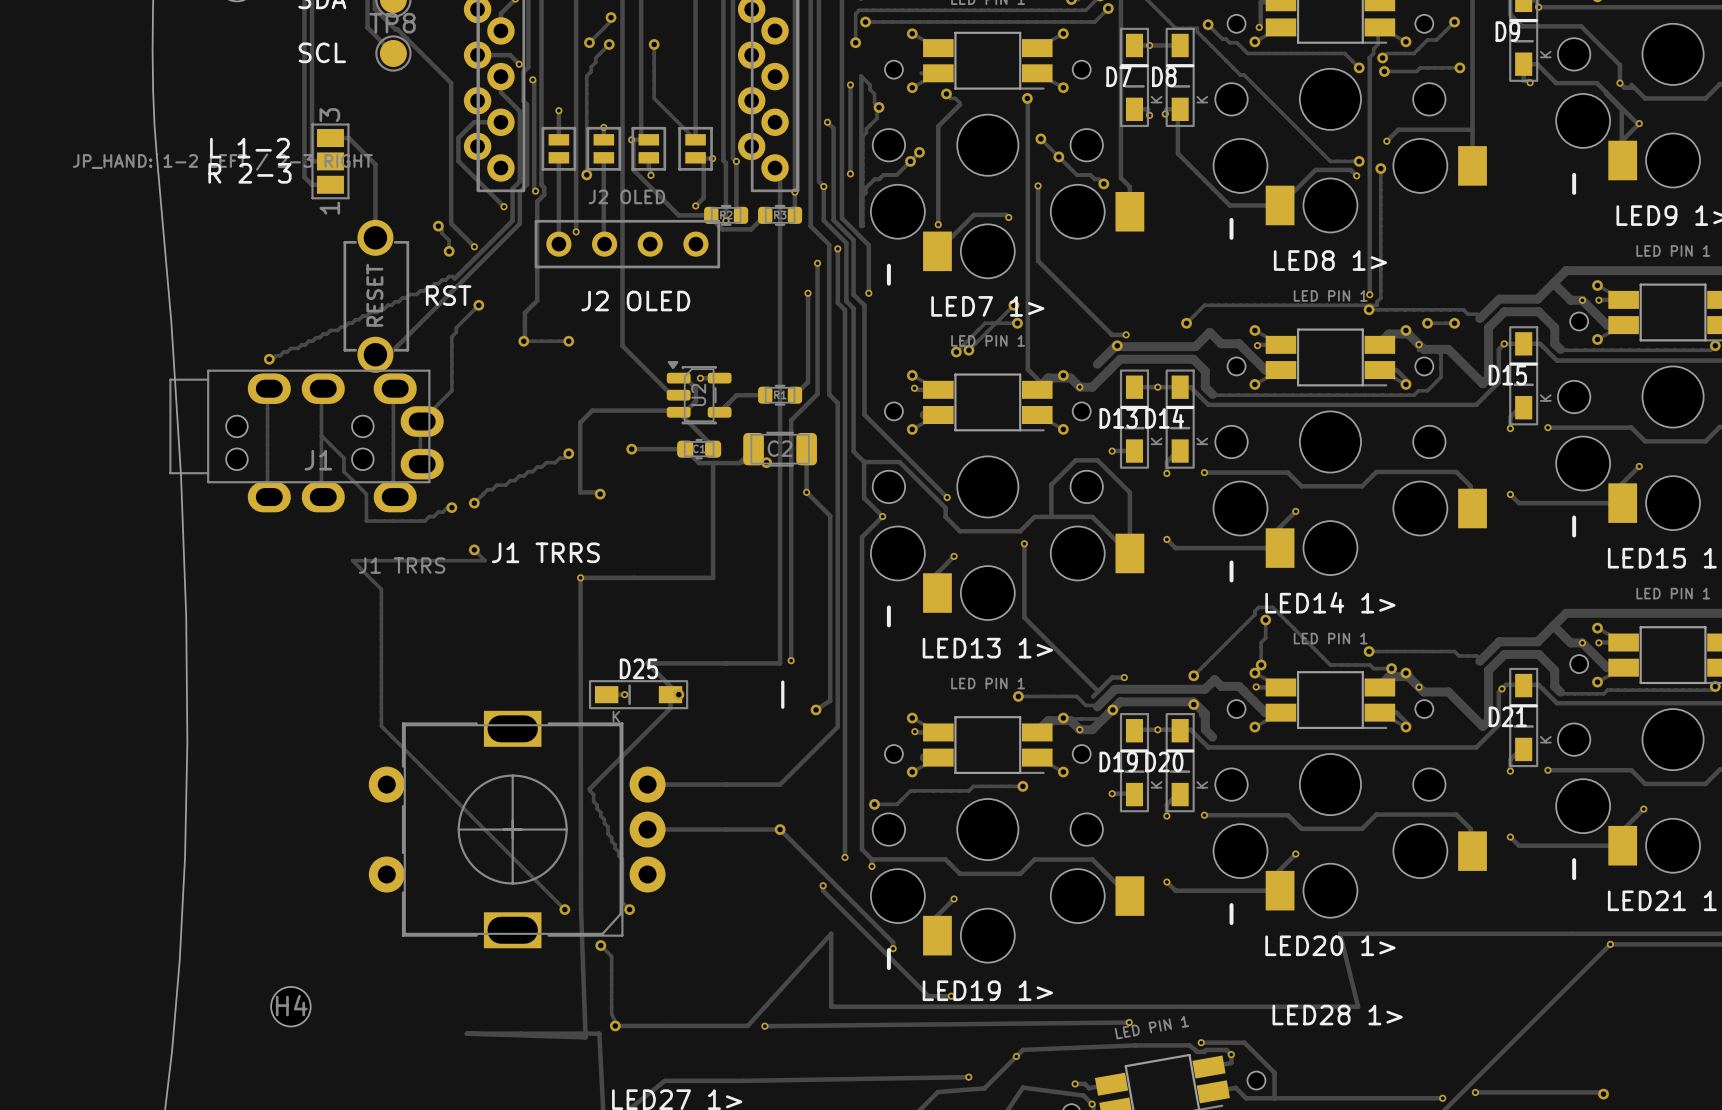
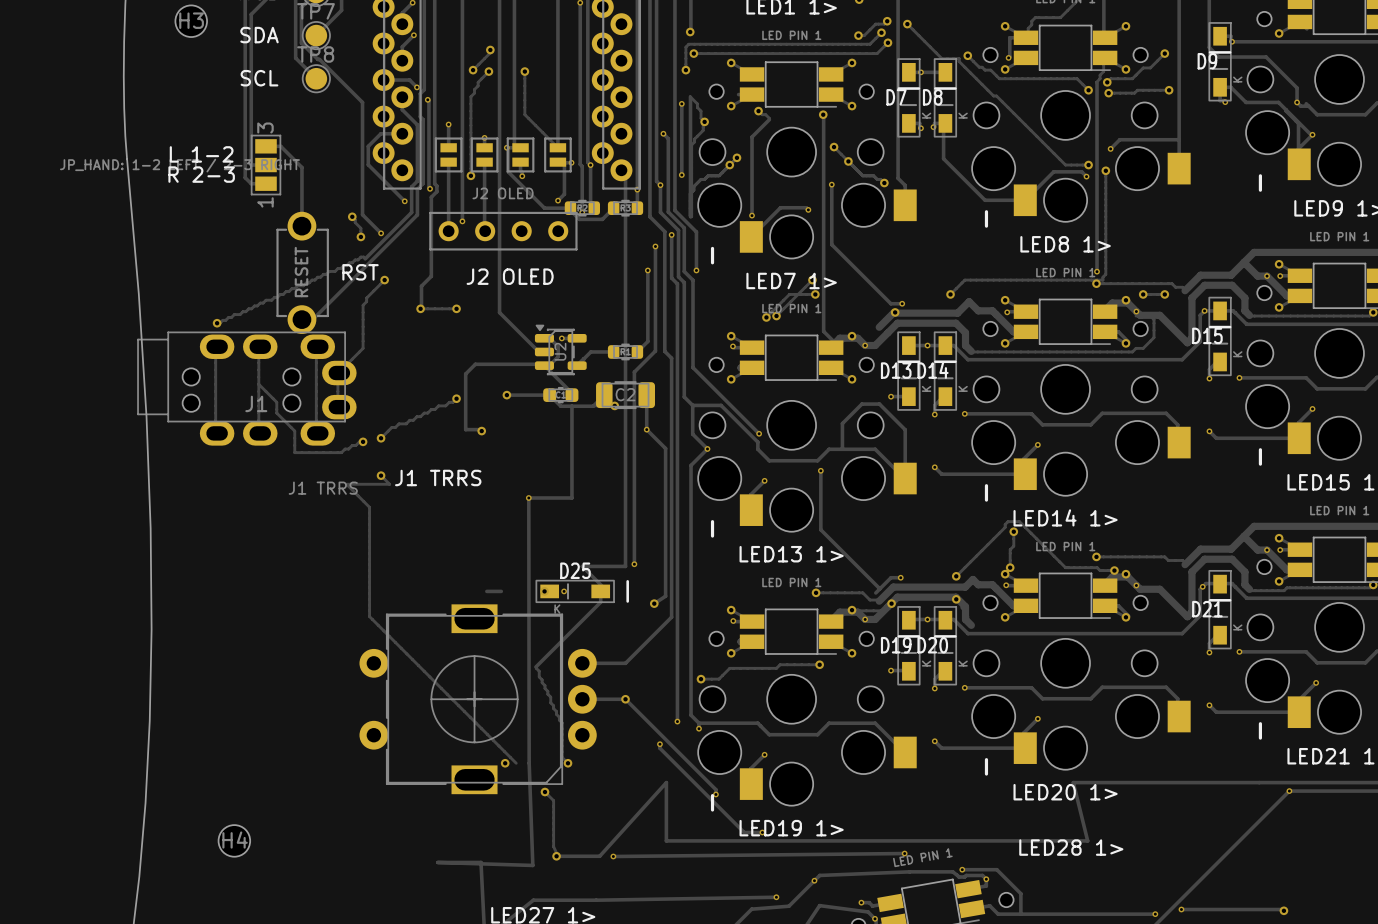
track: (431, 560) (352, 560) (381, 589) (381, 726) (564, 909) -> (346, 484) (369, 507) (369, 616) (516, 763)
via: (580, 577) -> none
track: (659, 577) (580, 577) (581, 909) (585, 1037) (466, 1033) (545, 1033) -> (528, 498) (529, 763) (532, 865) (437, 862)
via: none -> (528, 498)
track: (726, 663) (647, 663) (678, 694) (670, 694) (670, 708) (589, 789) (593, 794) (593, 801) (608, 826) (608, 834) (622, 859) (622, 902) (629, 909) -> (582, 566) (607, 591) (600, 591) (600, 602) (535, 666) (550, 697) (550, 702) (562, 722) (562, 757) (568, 763)
text position: D25 (638, 668) -> D25 (575, 570)
via: (624, 694) -> none
part position: (638, 694) -> (575, 591)
via: none -> (564, 591)
track: (647, 784) (726, 784) -> none
part position: (517, 829) -> (478, 699)
track: (647, 829) (726, 829) -> none
via: (564, 909) -> none
via: none -> (568, 763)
track: (600, 945) (611, 956) (611, 1013) (616, 1024) (615, 1025) (693, 1025) -> (544, 792) (553, 800) (553, 846) (556, 856)
via: (600, 945) -> none
via: none -> (544, 792)
via: (615, 1025) -> none
via: none -> (556, 856)

